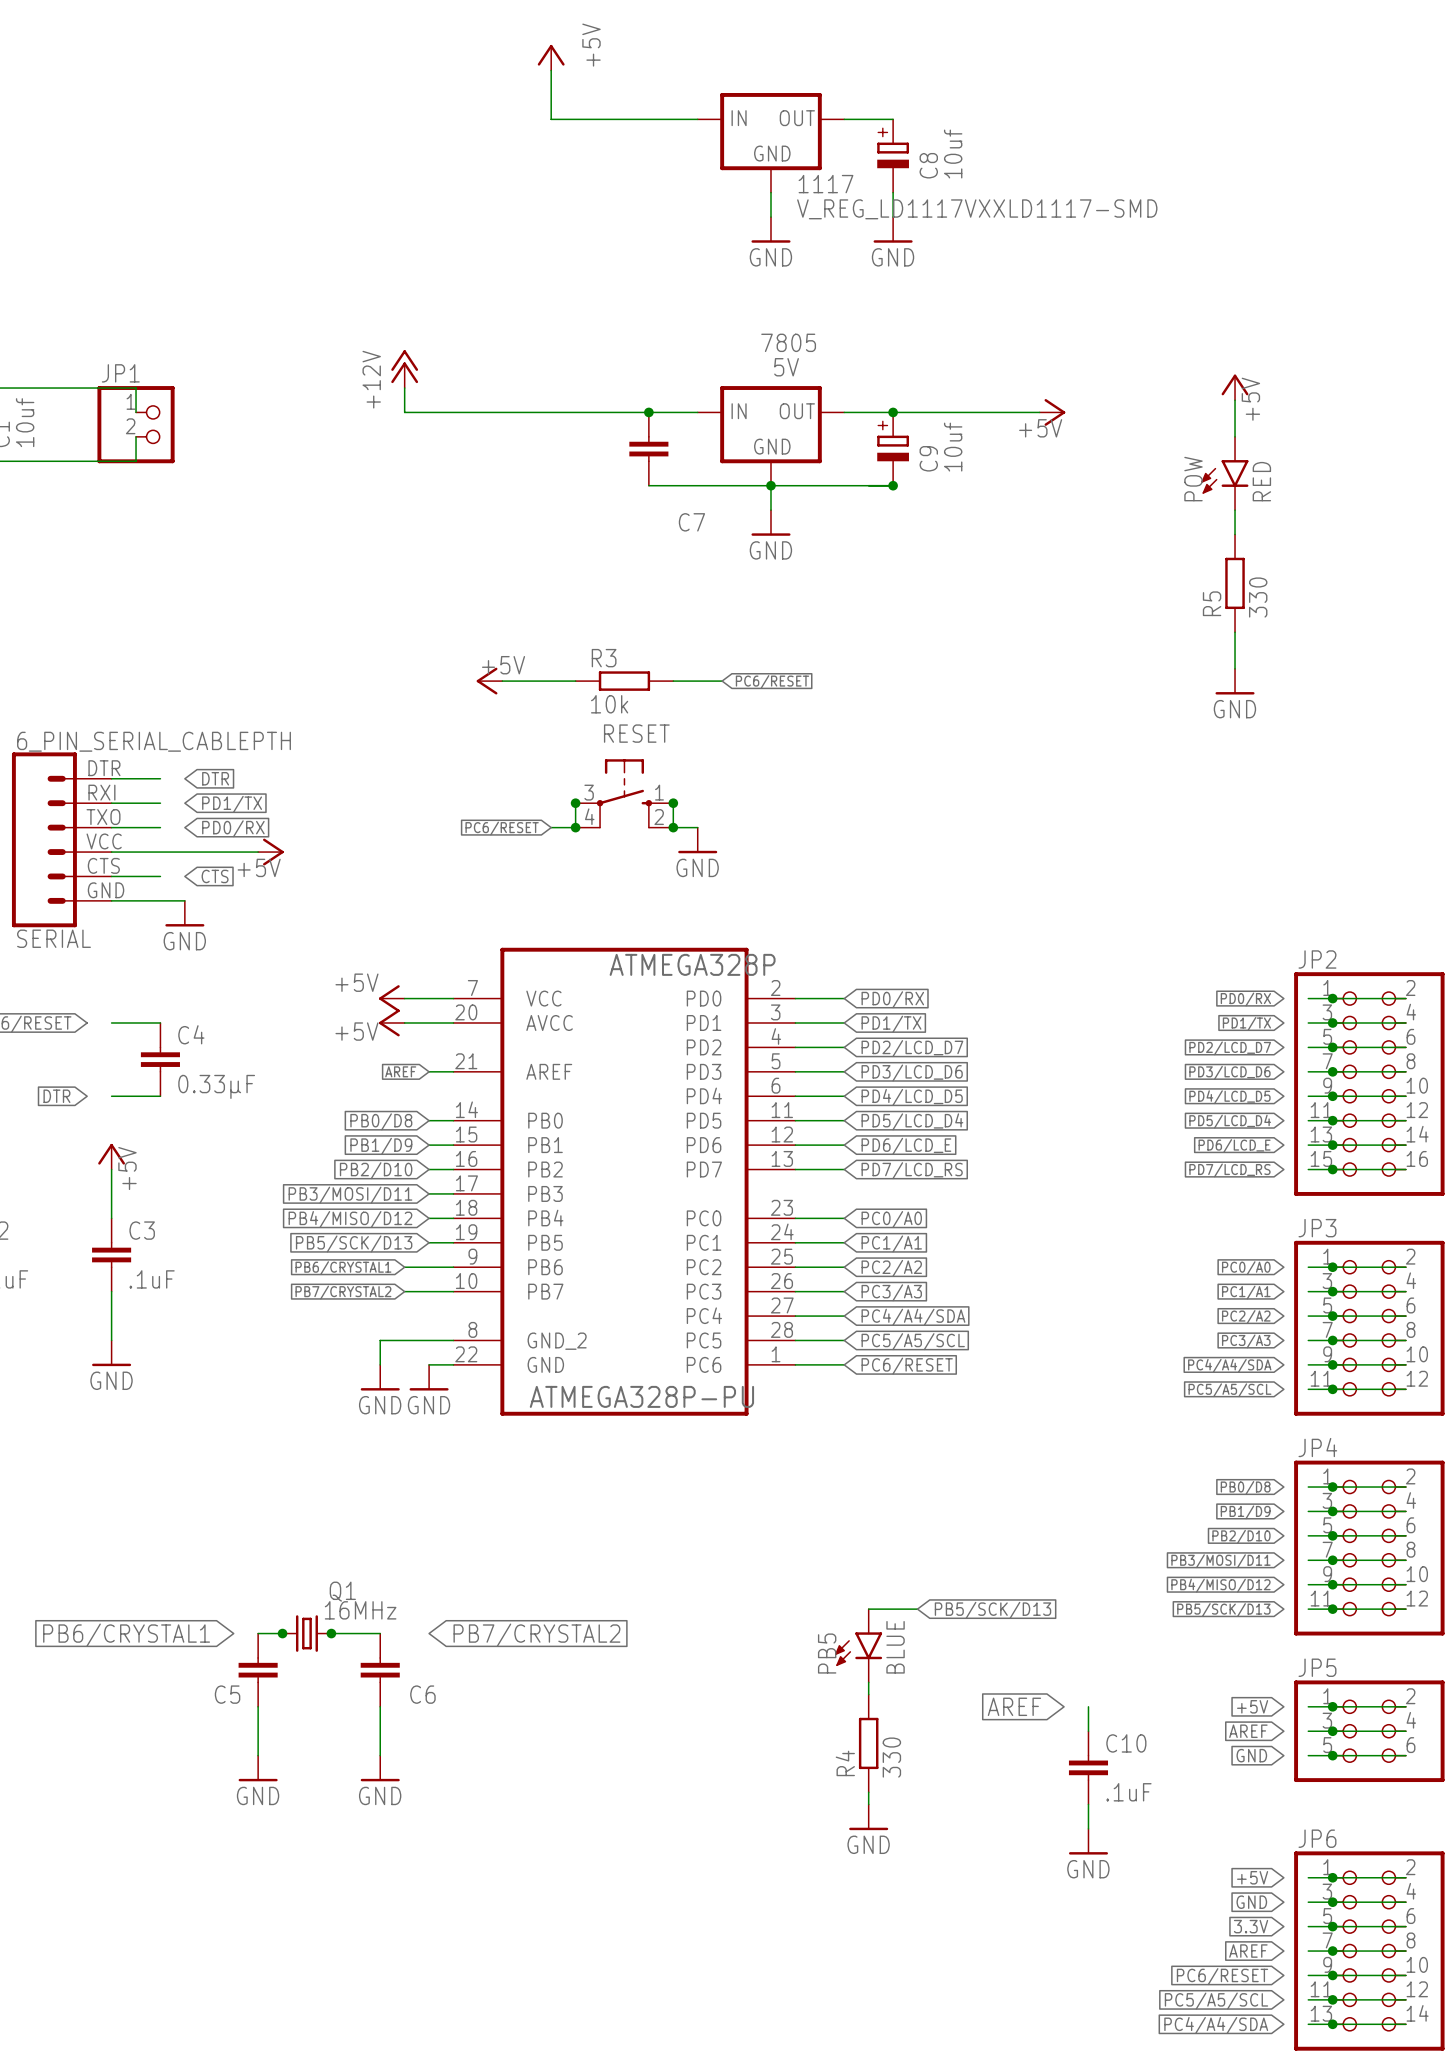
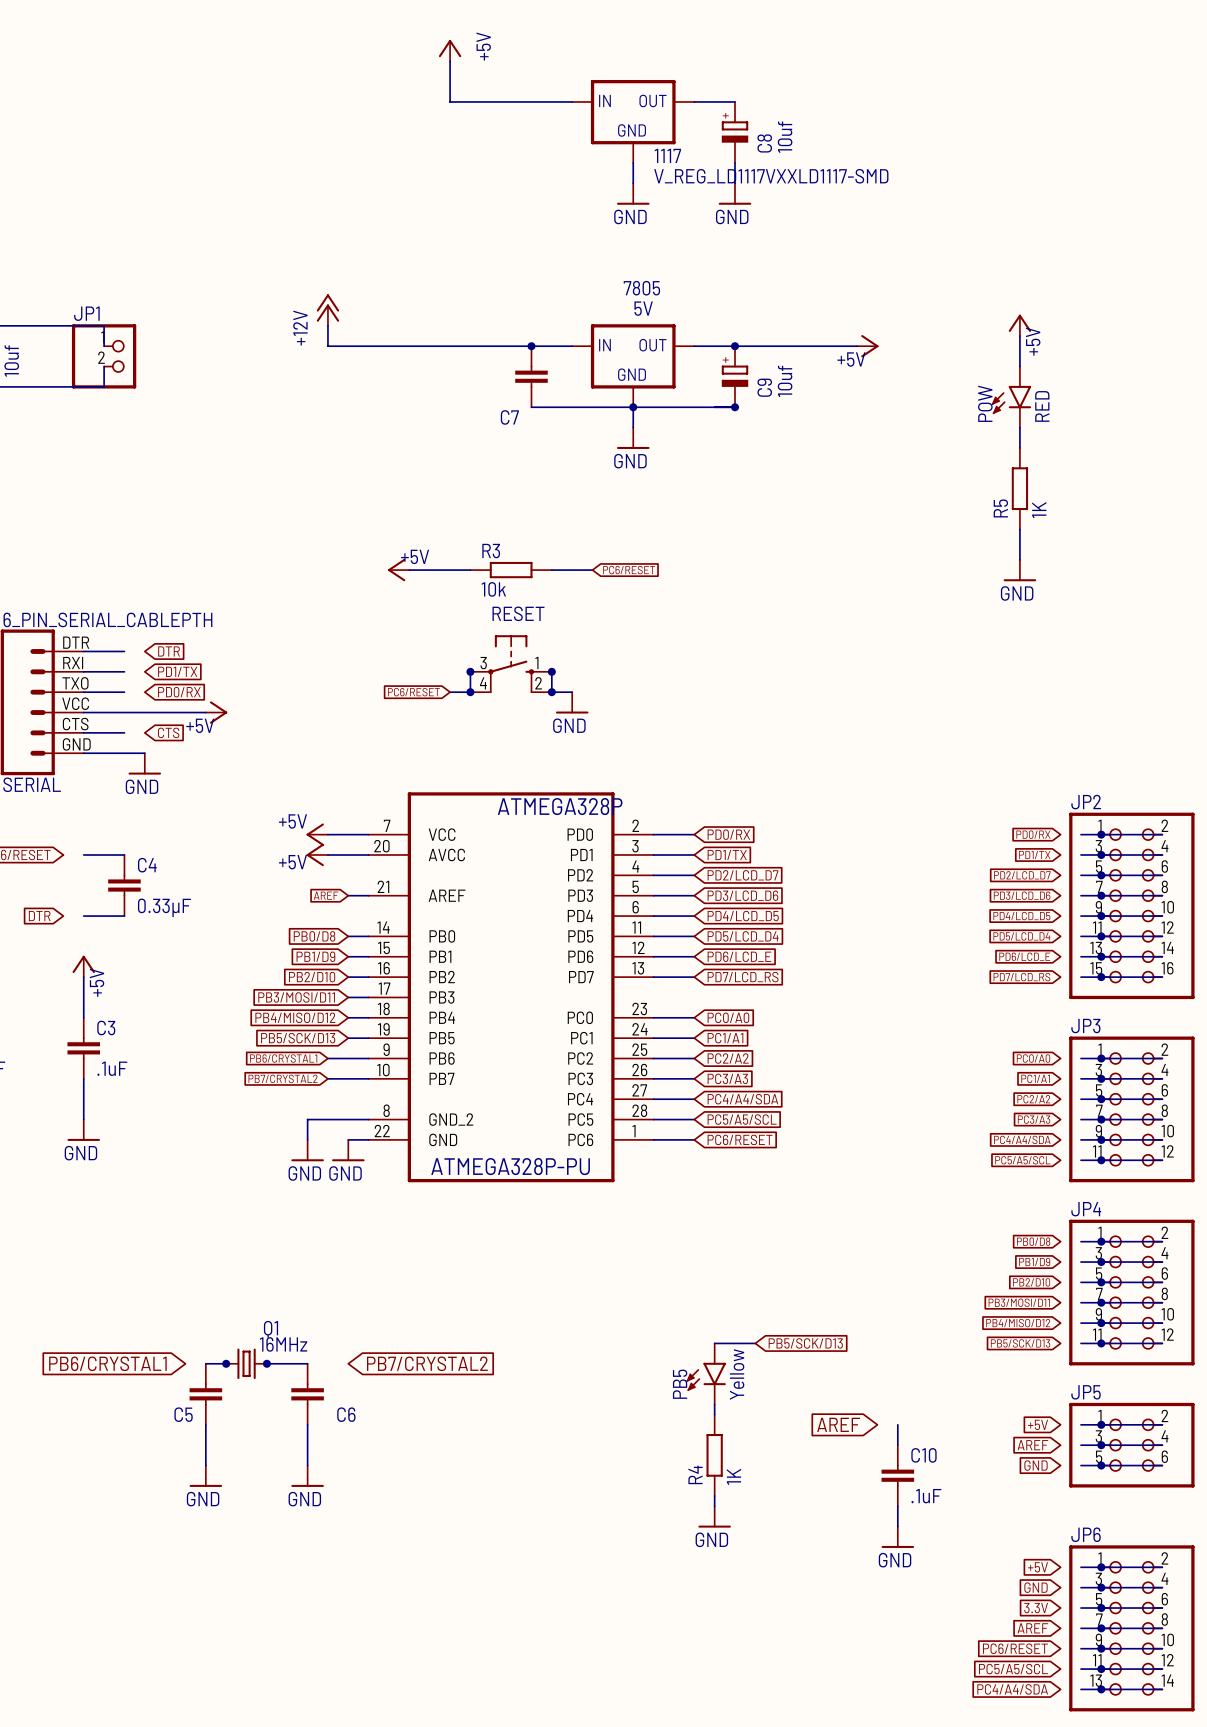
C7 name position: C7 (691, 522) -> C7 (509, 417)
R5 value: 330 (1258, 597) -> 1K (1039, 510)
PB5 value: BLUE (895, 1647) -> Yellow (737, 1374)
R4 value: 330 (891, 1757) -> 1K (733, 1476)

